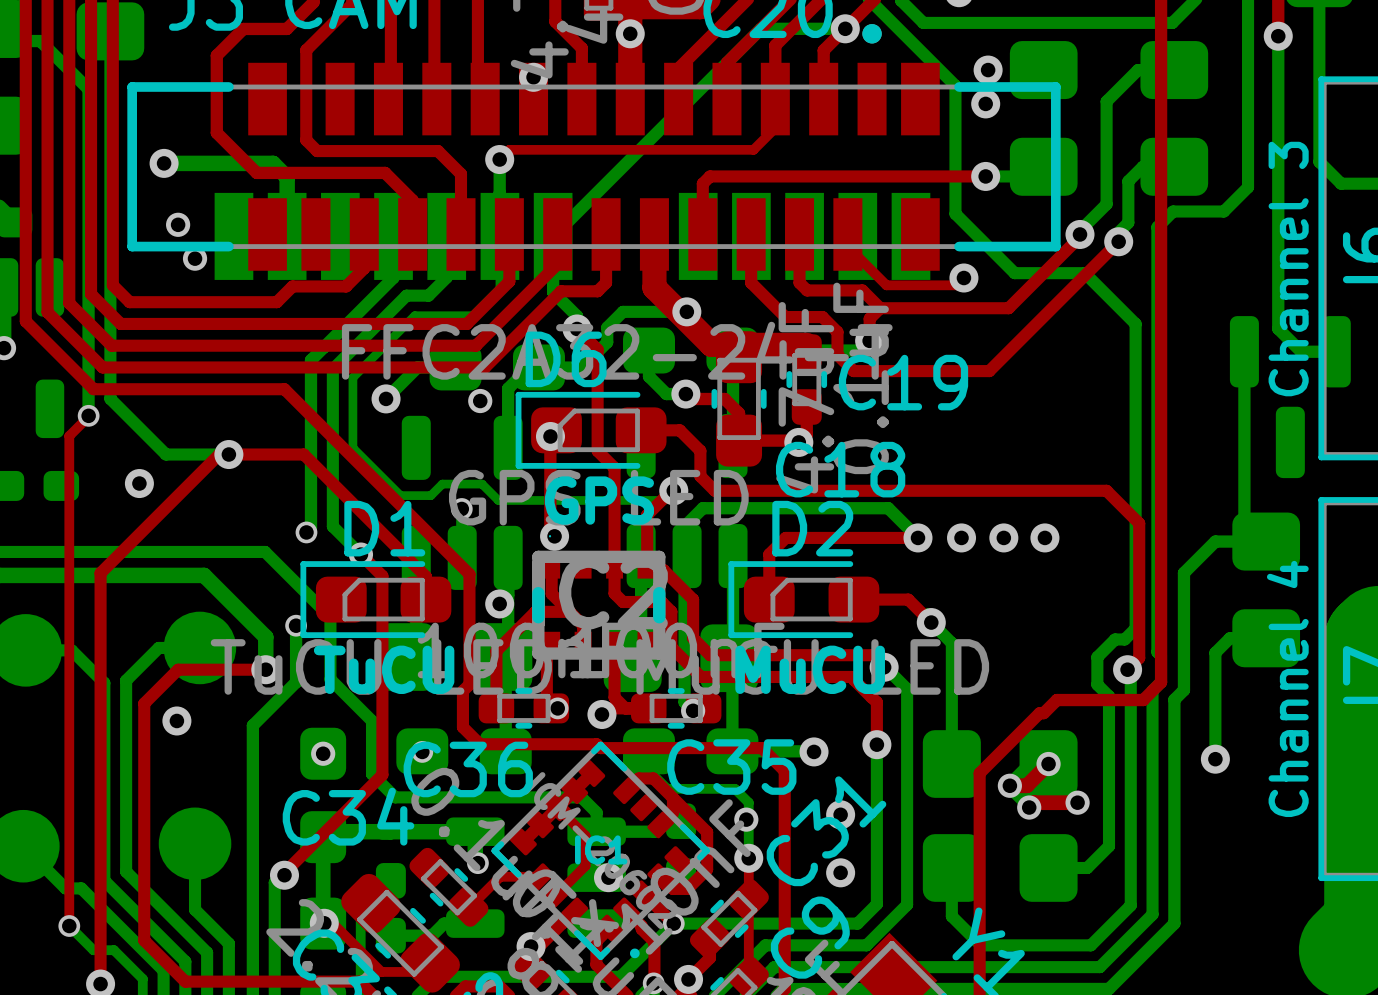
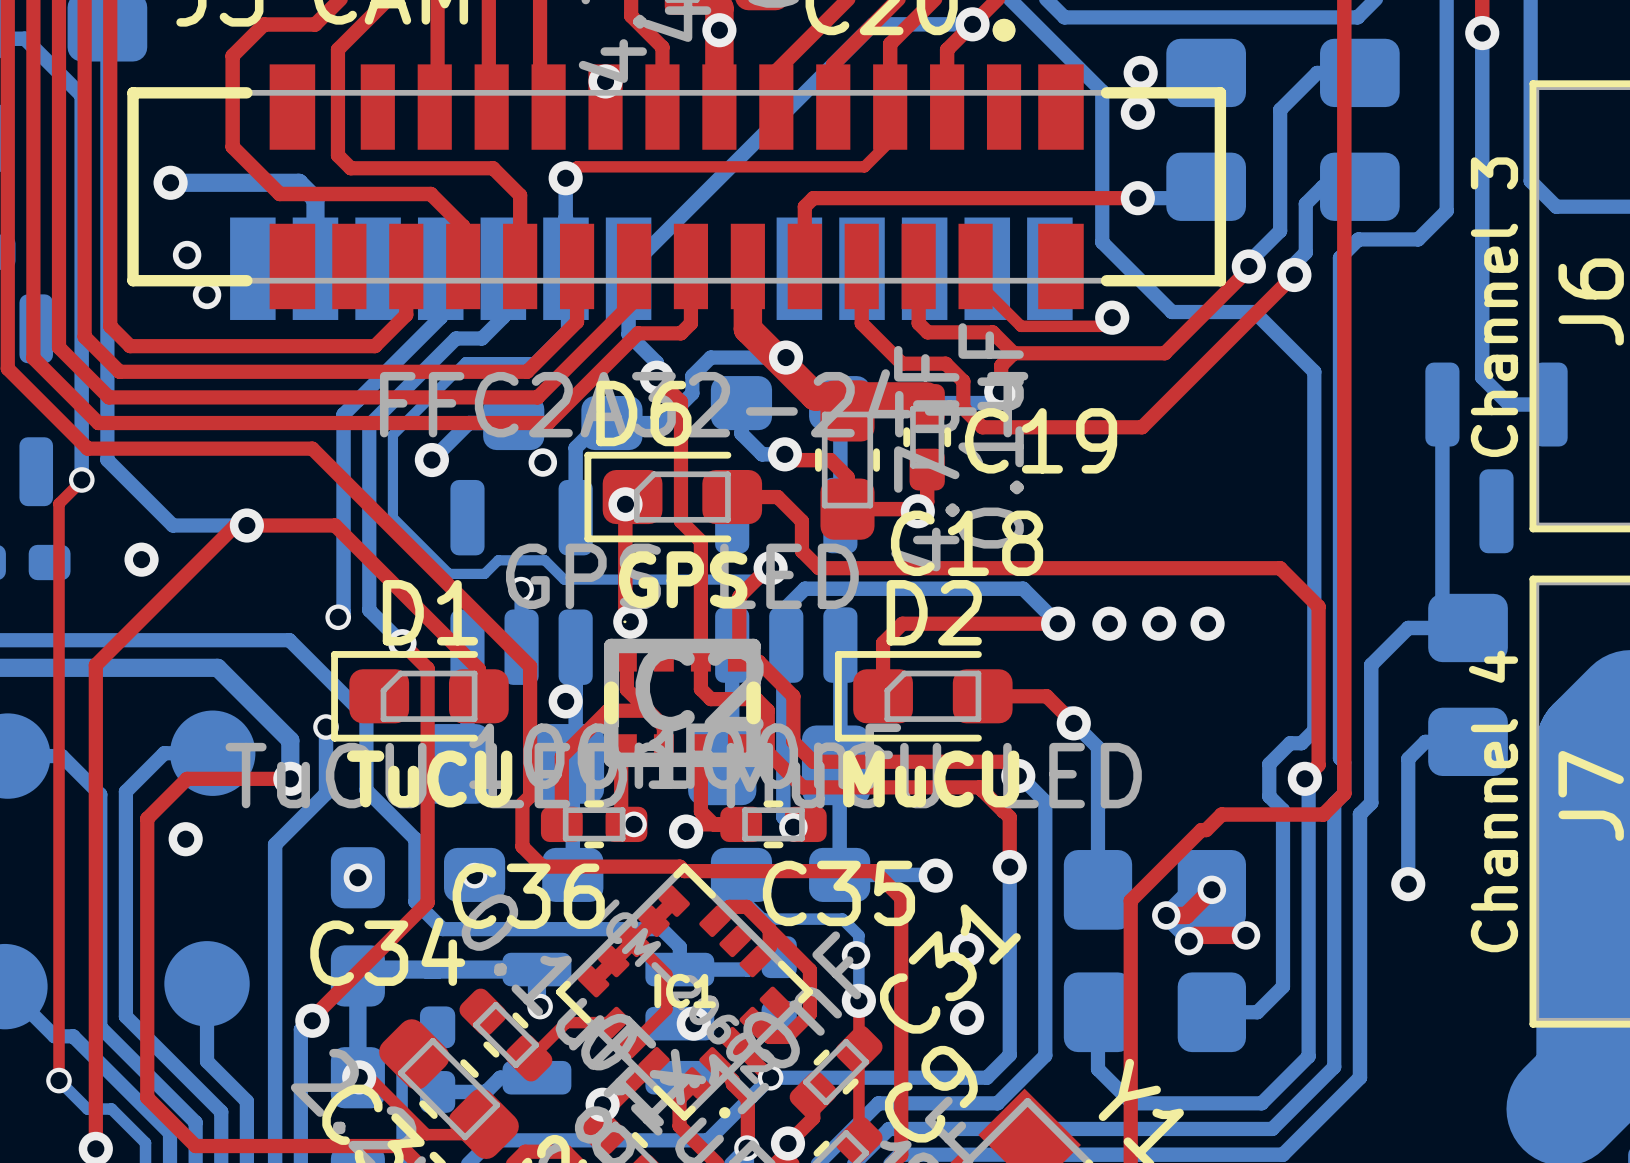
top track: (364, 268) (346, 286) (292, 286) (276, 302) -> (406, 306) (406, 314) (374, 346) (303, 346)

